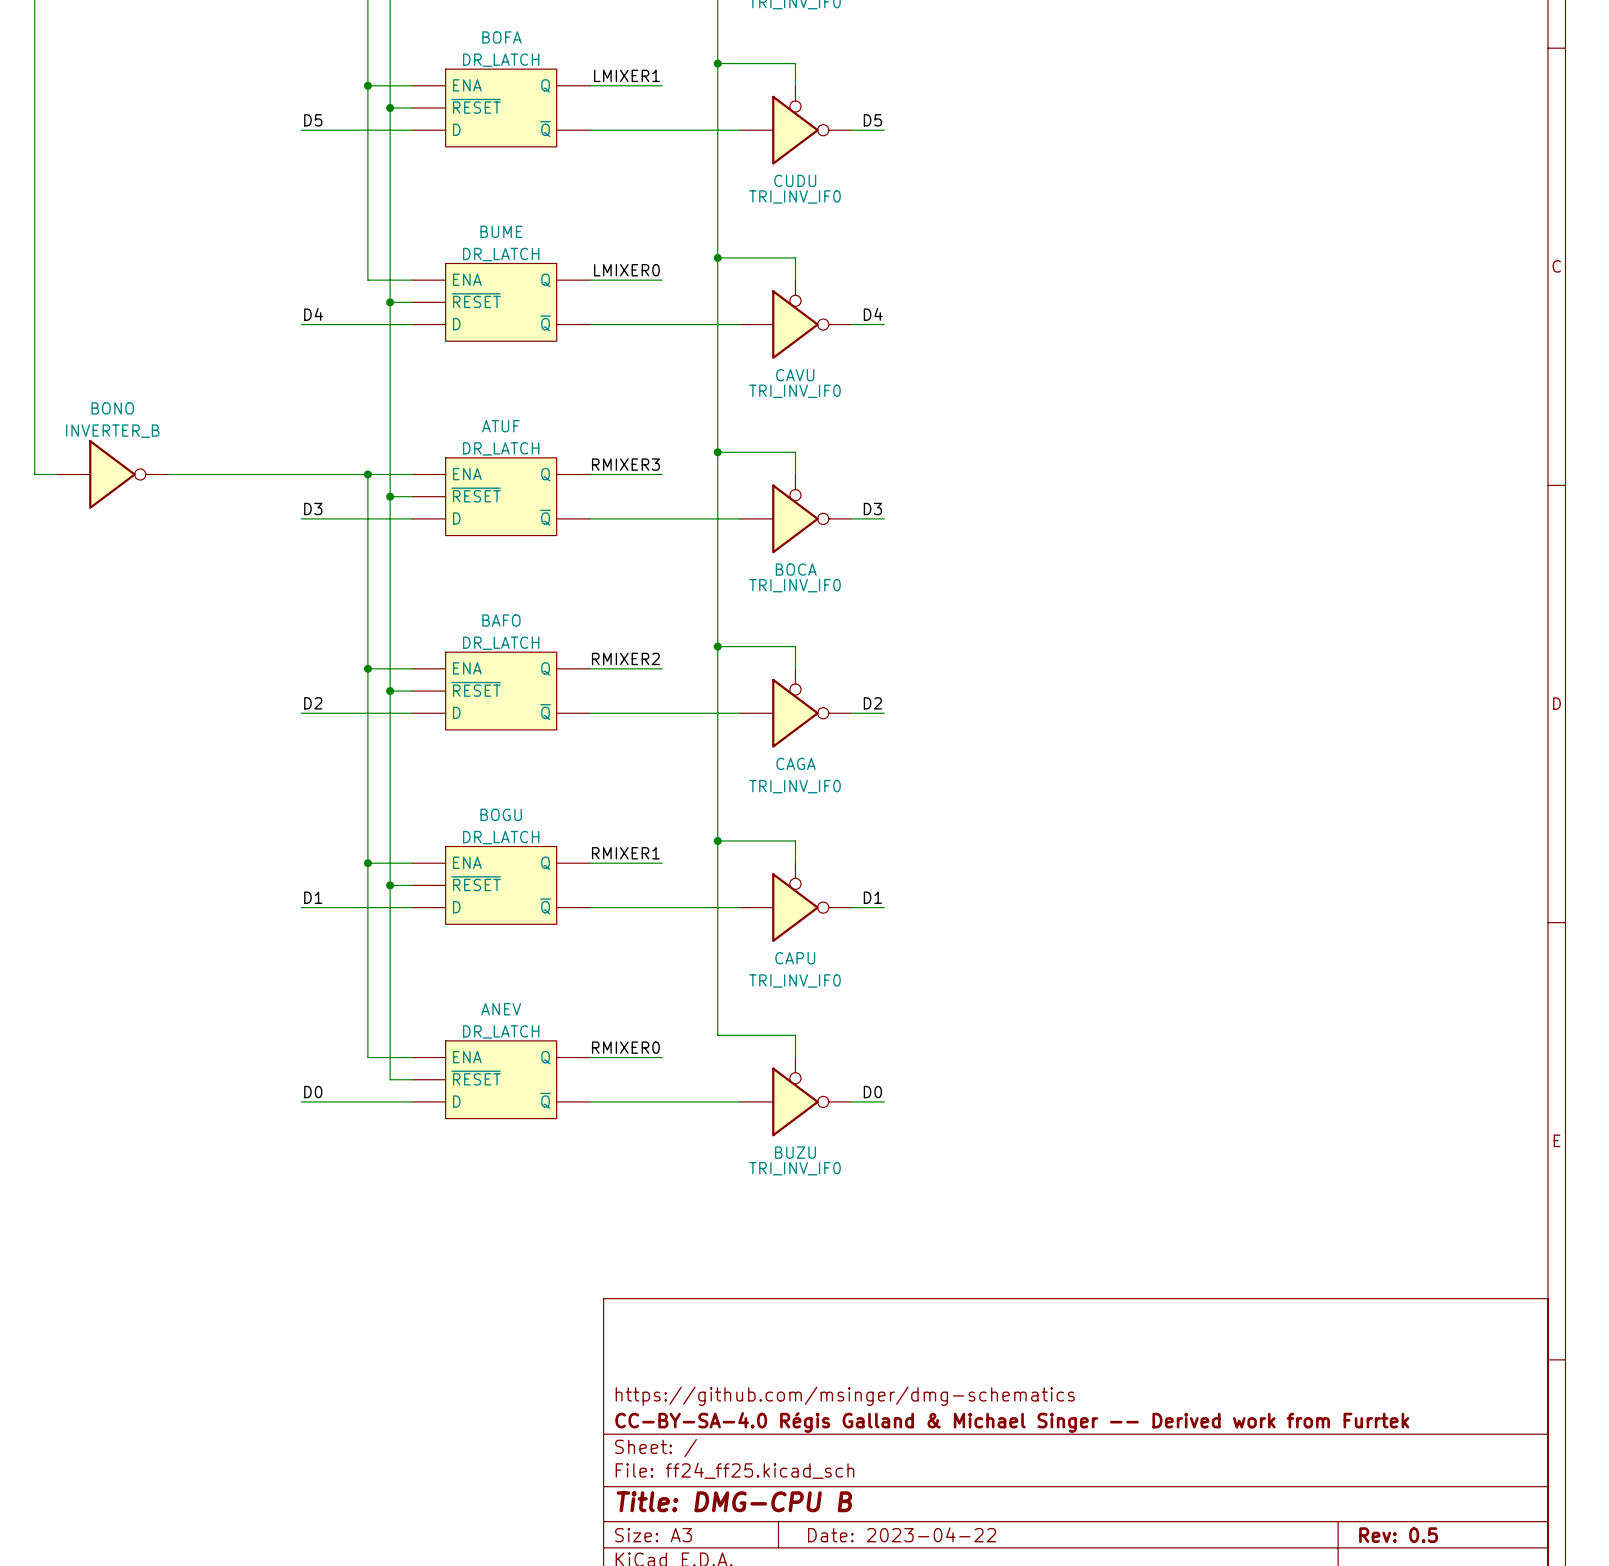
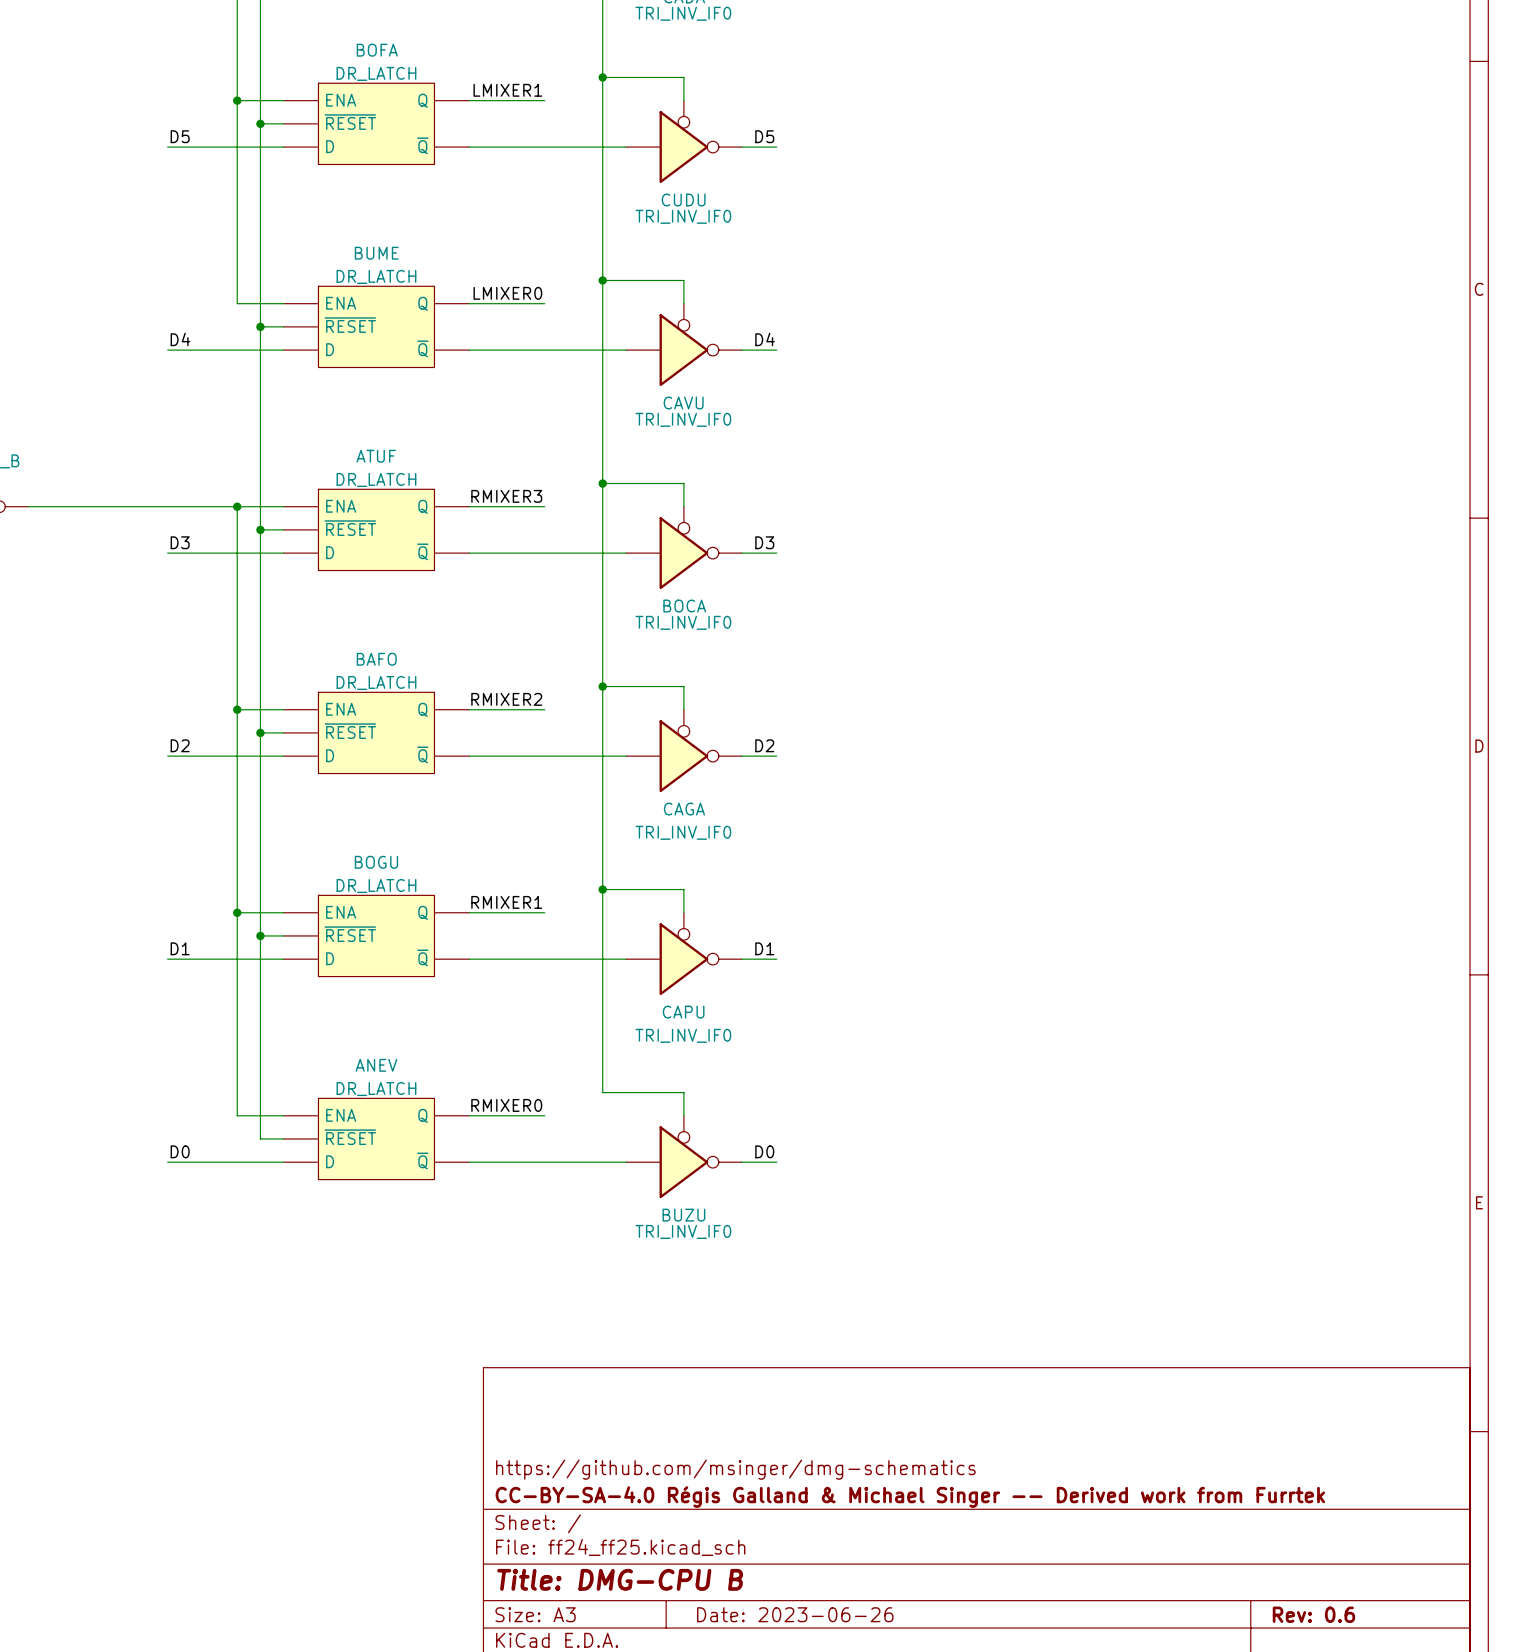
title block: Date: 2023-04-22 (902, 1534) -> Date: 2023-06-26 (795, 1614)
title block: Rev: 0.5 (1398, 1535) -> Rev: 0.6 (1313, 1614)

